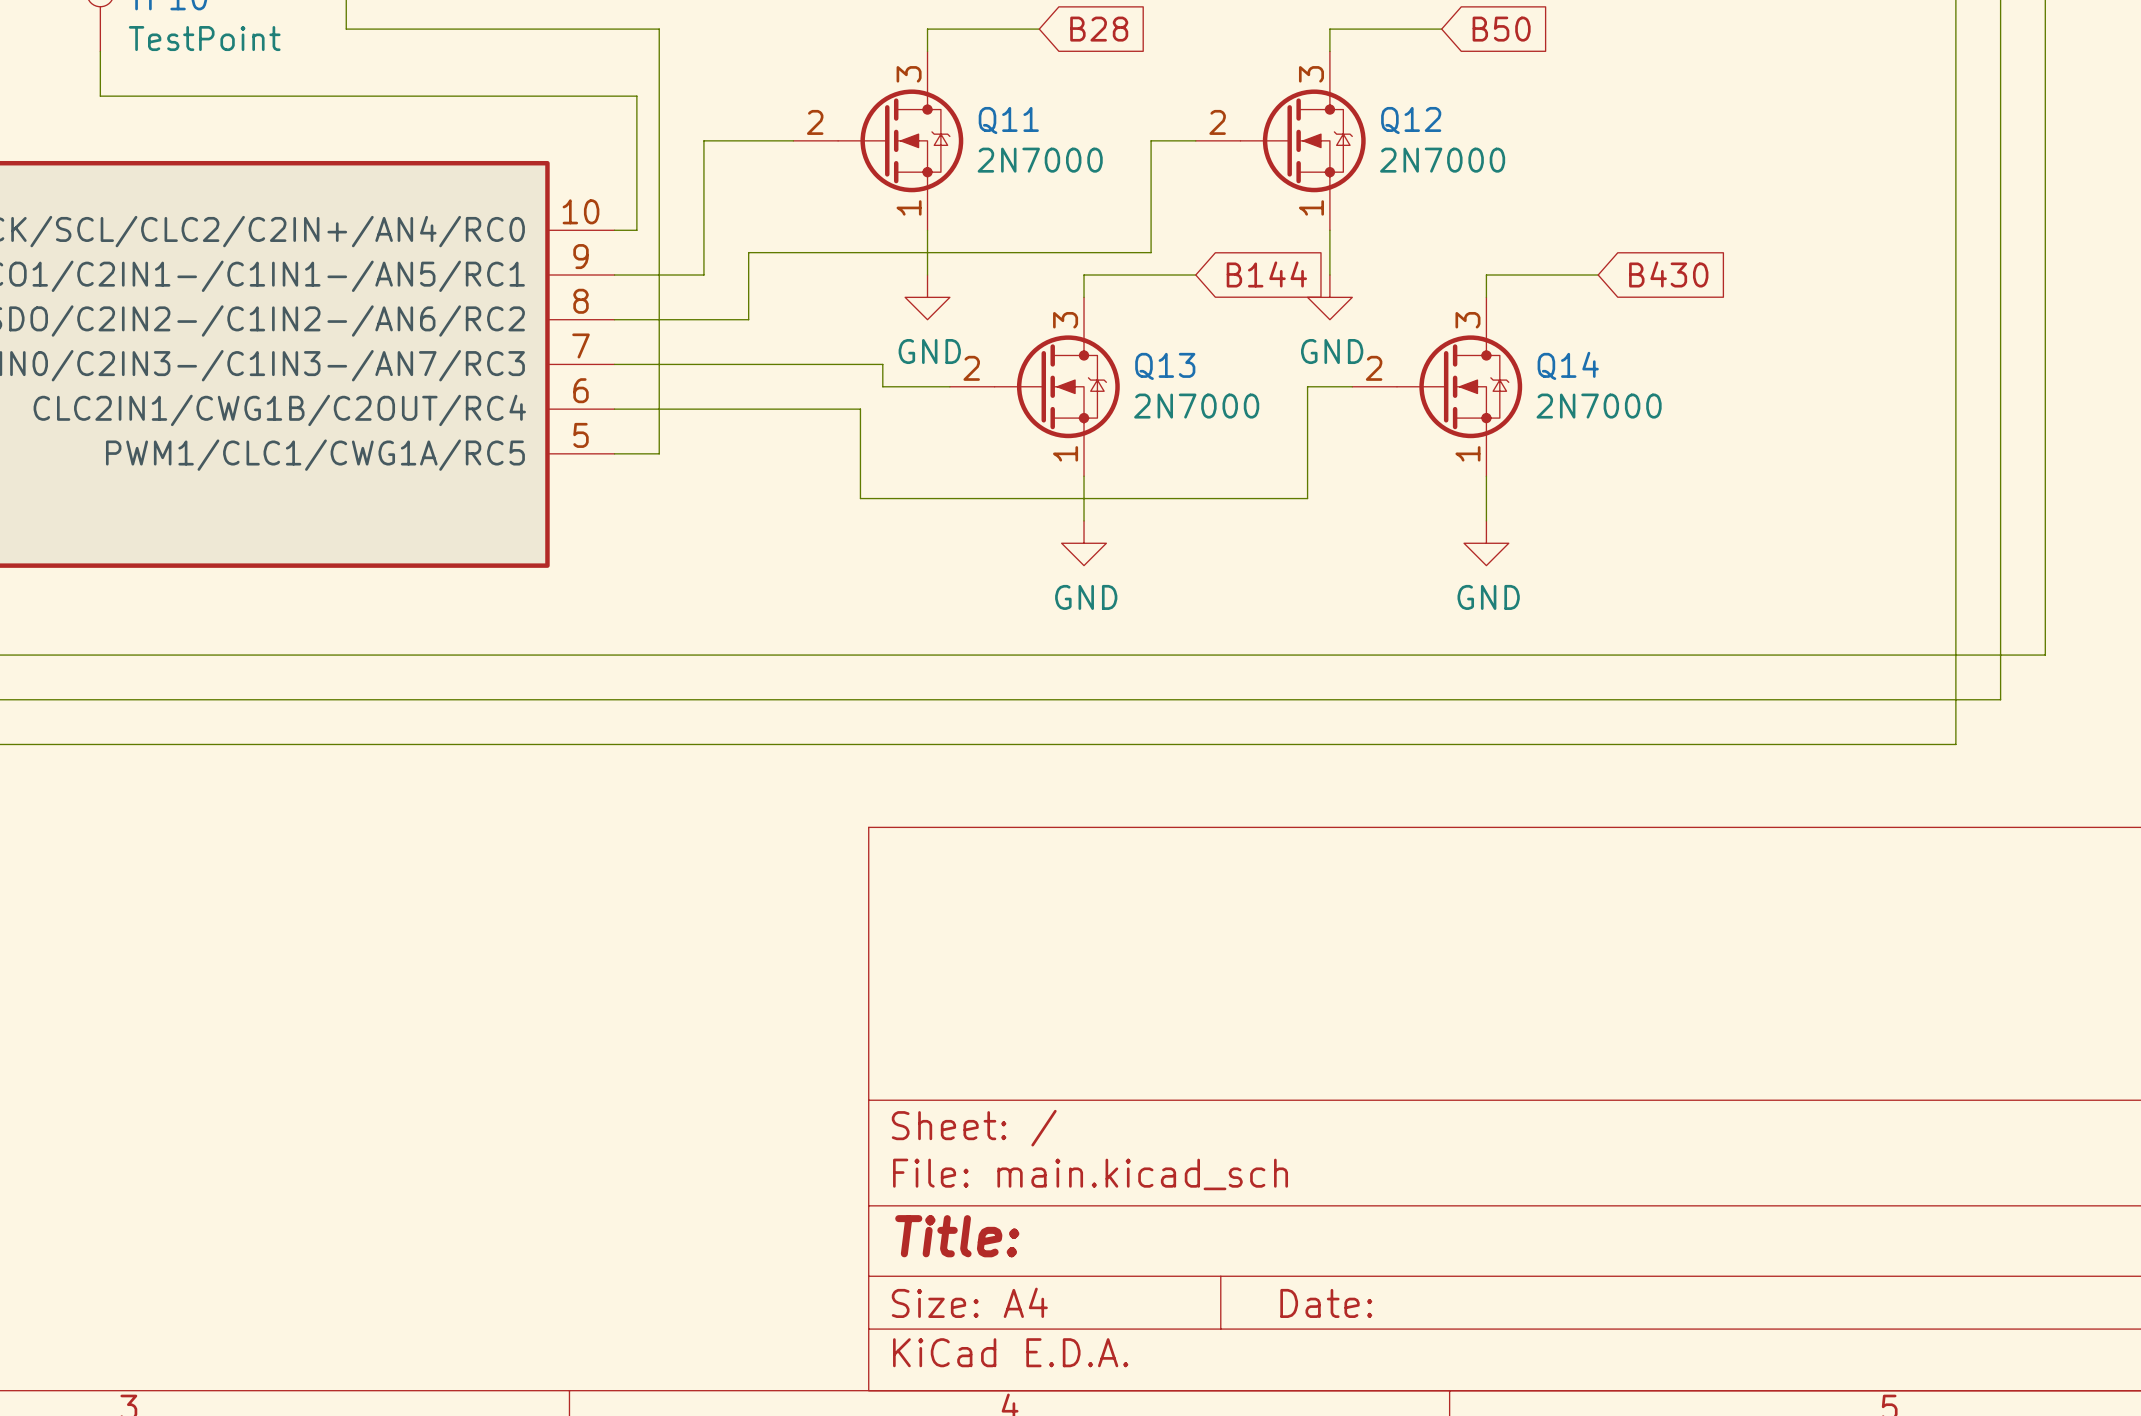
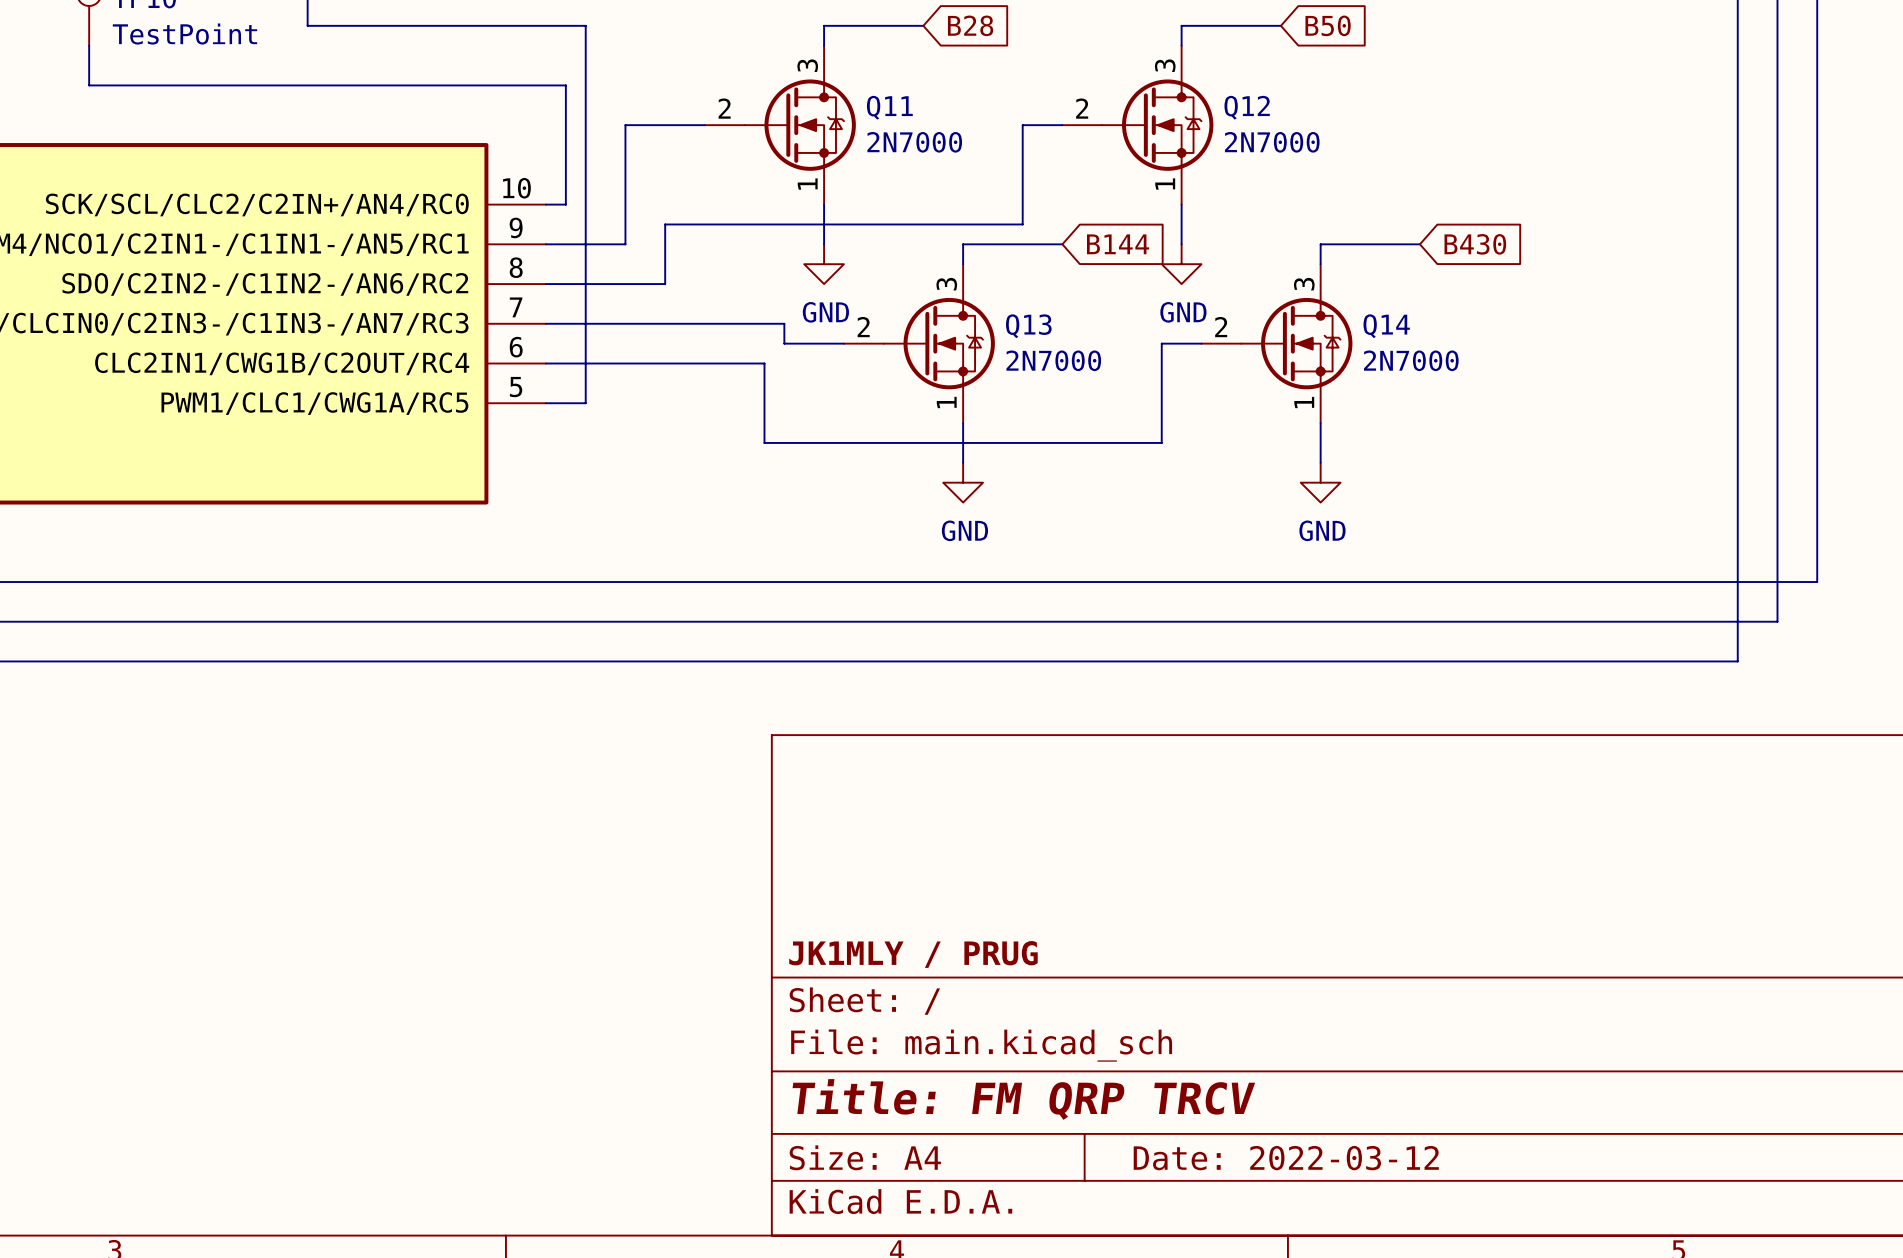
title block: none -> JK1MLY / PRUG (913, 954)
title block: Title: (957, 1236) -> Title: FM QRP TRCV (1023, 1099)
title block: Date: (1326, 1303) -> Date: 2022-03-12 (1286, 1158)

